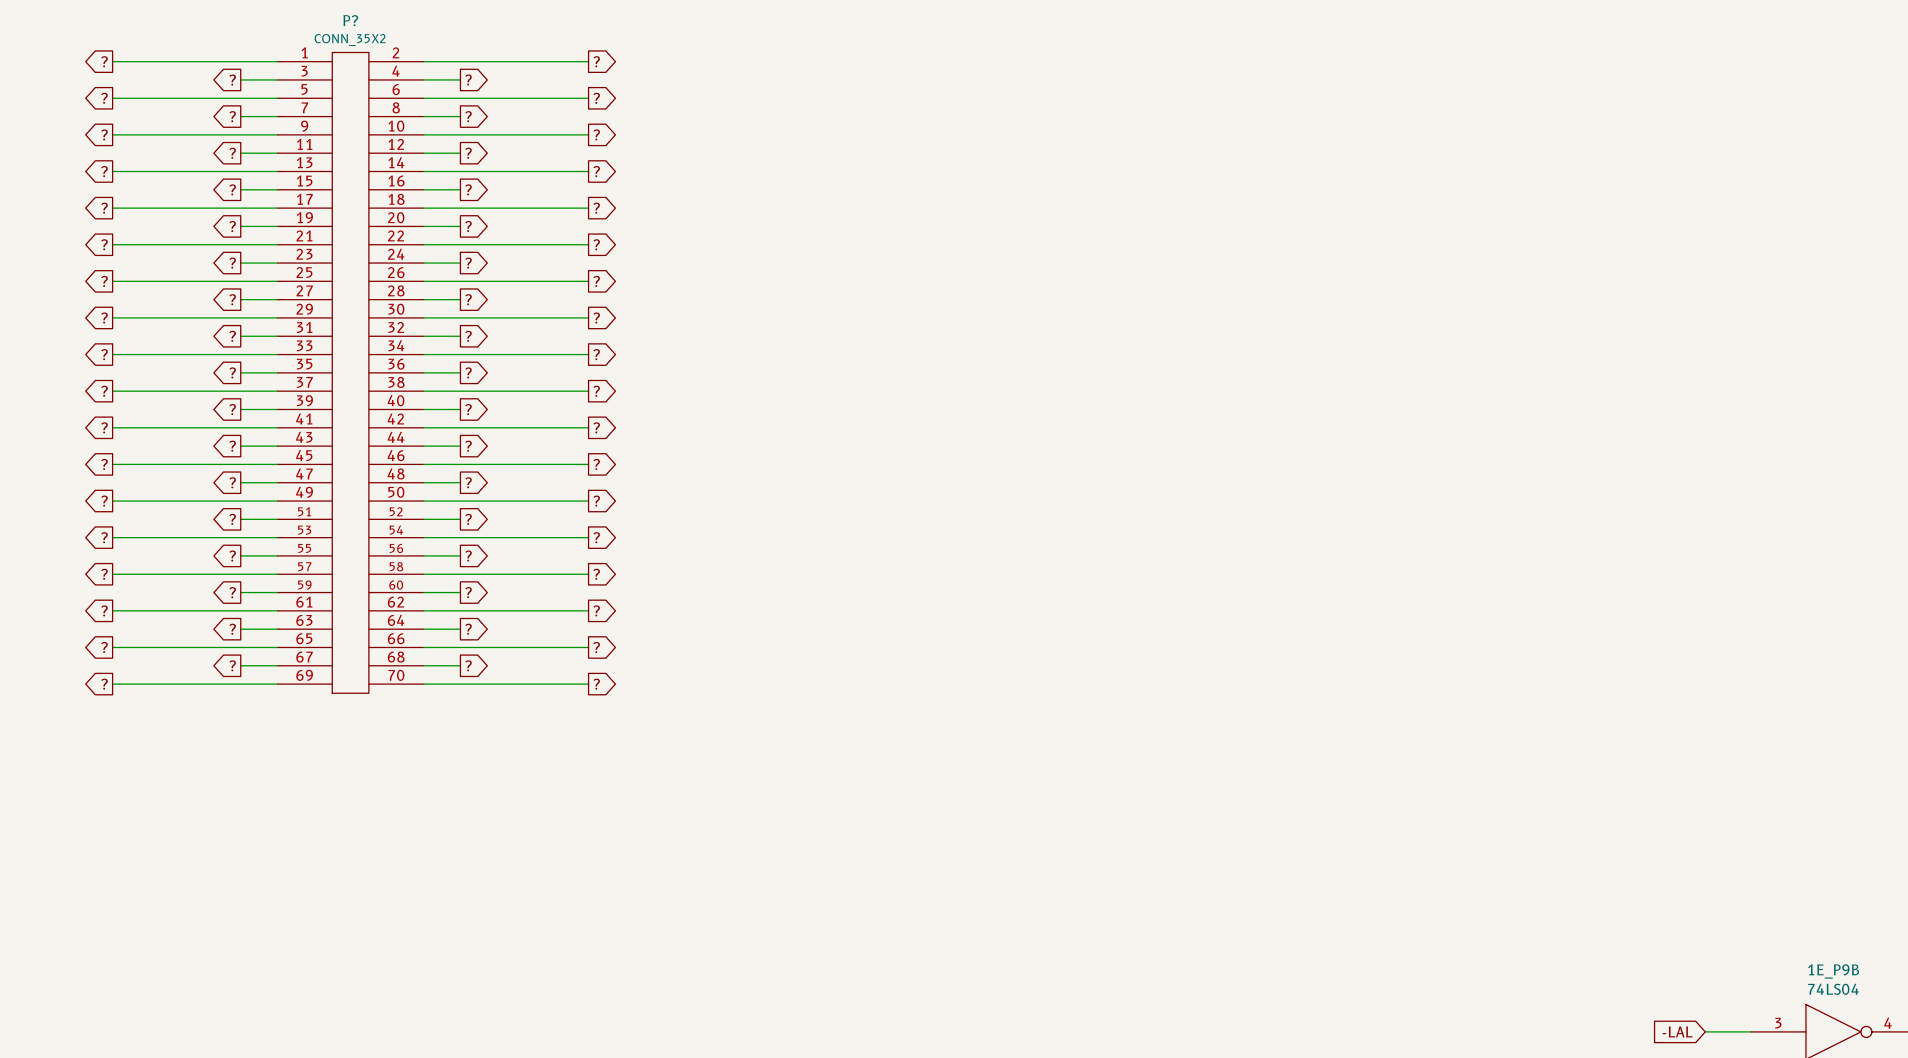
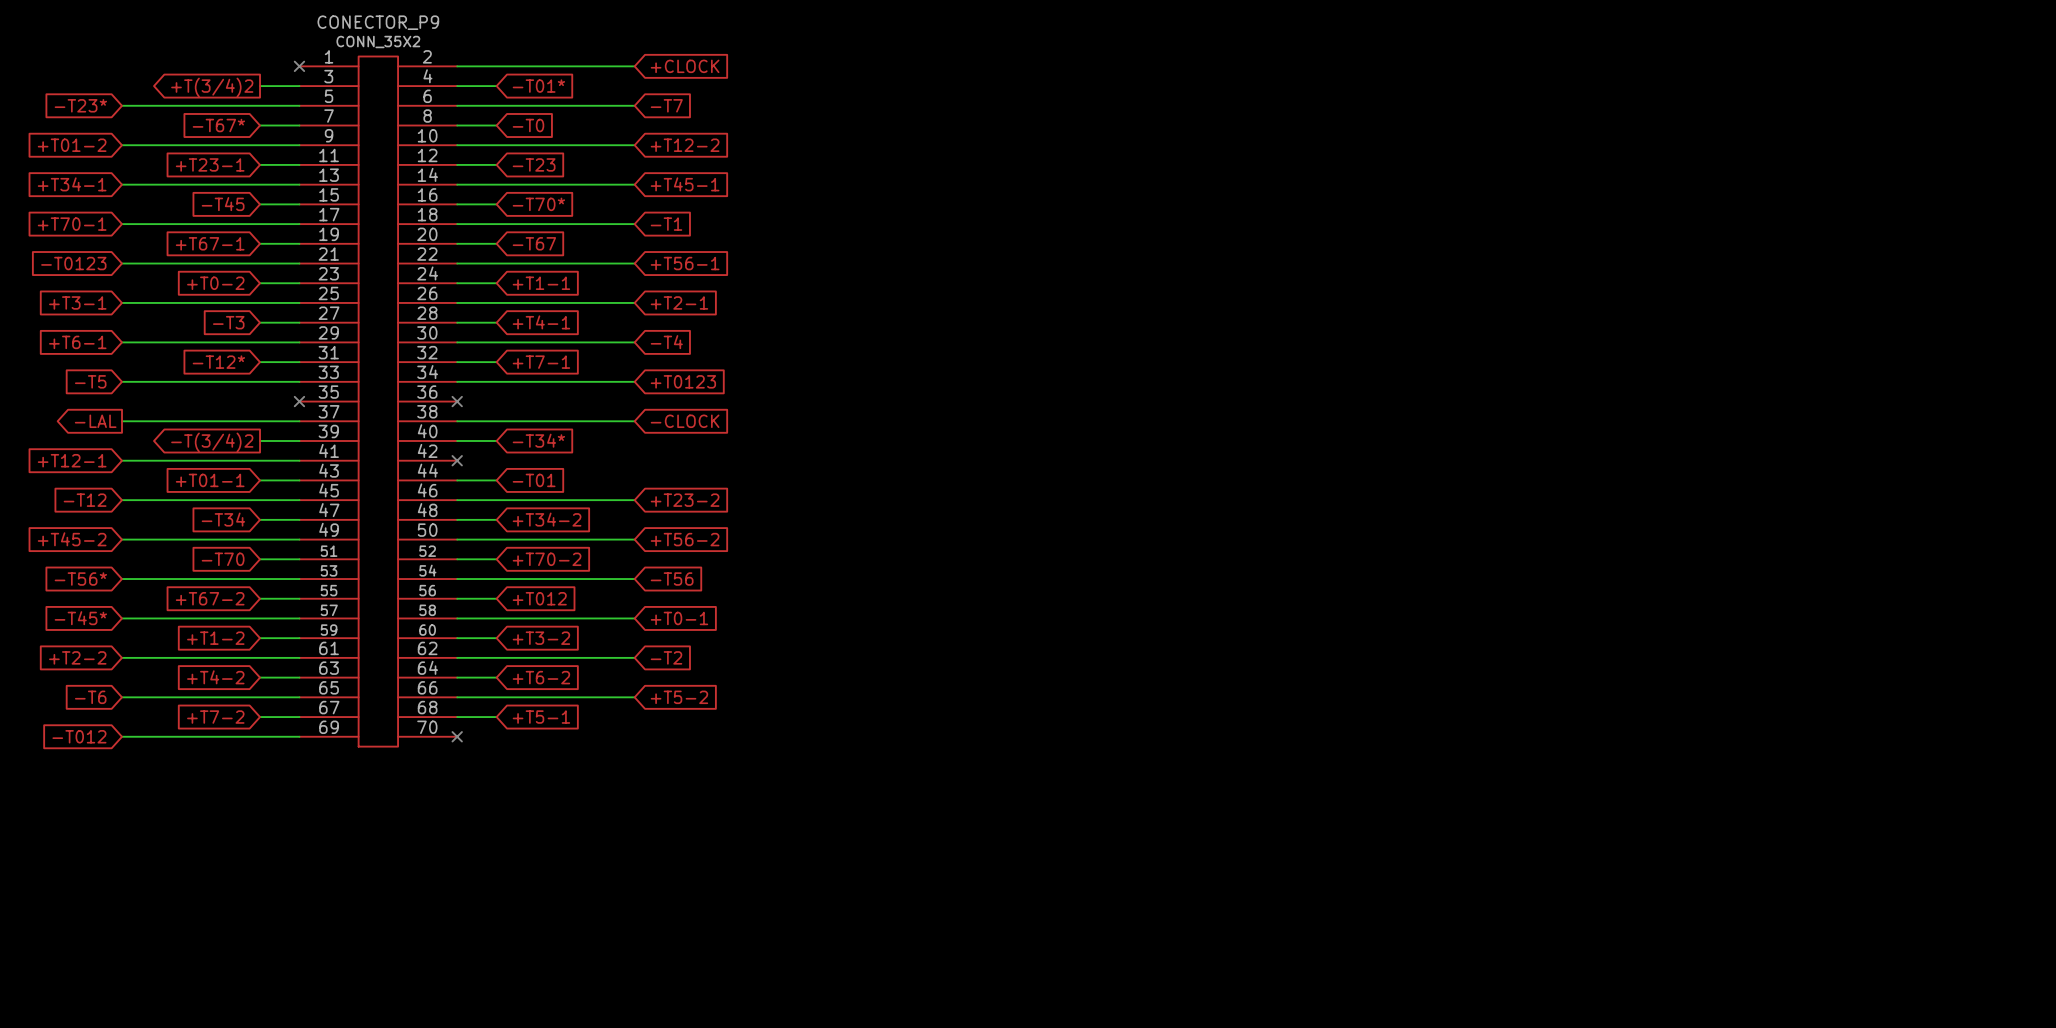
P? name: P? (350, 20) -> CONECTOR_P9 (378, 22)
global label: ? (104, 61) -> none
wire: (112, 61) (277, 61) -> none
no-connect mark: none -> (299, 66)
global label shape: output (596, 61) -> input (685, 66)
global label: ? (596, 61) -> +CLOCK (685, 66)
global label: ? (232, 80) -> +T(3/4)2 (212, 87)
global label shape: output (468, 80) -> input (538, 86)
global label: ? (468, 80) -> -T01* (538, 86)
global label shape: output (104, 98) -> input (80, 105)
global label: ? (104, 98) -> -T23* (80, 105)
global label shape: output (596, 98) -> input (666, 105)
global label: ? (596, 98) -> -T7 (666, 105)
global label shape: output (232, 116) -> input (218, 125)
global label: ? (232, 116) -> -T67* (218, 125)
global label shape: output (468, 116) -> input (528, 125)
global label: ? (468, 116) -> -T0 (528, 125)
global label shape: output (104, 134) -> input (72, 145)
global label: ? (104, 134) -> +T01-2 (72, 145)
global label shape: output (596, 134) -> input (685, 145)
global label: ? (596, 134) -> +T12-2 (685, 145)
global label shape: output (232, 153) -> input (210, 164)
global label: ? (232, 153) -> +T23-1 (210, 164)
global label shape: output (468, 153) -> input (534, 164)
global label: ? (468, 153) -> -T23 (534, 164)
global label shape: output (104, 171) -> input (72, 184)
global label: ? (104, 171) -> +T34-1 (72, 184)
global label shape: output (596, 171) -> input (685, 184)
global label: ? (596, 171) -> +T45-1 (685, 184)
global label shape: output (232, 189) -> input (223, 204)
global label: ? (232, 189) -> -T45 (223, 204)
global label shape: output (468, 189) -> input (538, 204)
global label: ? (468, 189) -> -T70* (538, 204)
global label shape: output (104, 208) -> input (72, 224)
global label: ? (104, 208) -> +T70-1 (72, 224)
global label shape: output (596, 208) -> input (666, 224)
global label: ? (596, 208) -> -T1 (666, 224)
global label shape: output (232, 226) -> input (210, 243)
global label: ? (232, 226) -> +T67-1 (210, 243)
global label shape: output (468, 226) -> input (534, 243)
global label: ? (468, 226) -> -T67 (534, 243)
global label shape: output (104, 244) -> input (73, 263)
global label: ? (104, 244) -> -T0123 (73, 263)
global label shape: output (596, 244) -> input (685, 263)
global label: ? (596, 244) -> +T56-1 (685, 263)
global label shape: output (232, 263) -> input (215, 283)
global label: ? (232, 263) -> +T0-2 (215, 283)
global label shape: output (468, 263) -> input (541, 283)
global label: ? (468, 263) -> +T1-1 (541, 283)
global label shape: output (104, 281) -> input (77, 302)
global label: ? (104, 281) -> +T3-1 (77, 302)
global label shape: output (596, 281) -> input (679, 302)
global label: ? (596, 281) -> +T2-1 (679, 302)
global label shape: output (232, 299) -> input (228, 322)
global label: ? (232, 299) -> -T3 (228, 322)
global label shape: output (468, 299) -> input (541, 322)
global label: ? (468, 299) -> +T4-1 (541, 322)
global label shape: output (104, 318) -> input (77, 342)
global label: ? (104, 318) -> +T6-1 (77, 342)
global label shape: output (596, 318) -> input (666, 342)
global label: ? (596, 318) -> -T4 (666, 342)
global label shape: output (232, 336) -> input (218, 362)
global label: ? (232, 336) -> -T12* (218, 362)
global label shape: output (468, 336) -> input (541, 362)
global label: ? (468, 336) -> +T7-1 (541, 362)
global label shape: output (104, 354) -> input (90, 381)
global label: ? (104, 354) -> -T5 (90, 381)
global label shape: output (596, 354) -> input (683, 381)
global label: ? (596, 354) -> +T0123 (683, 381)
global label: ? (232, 372) -> none
wire: (240, 372) (277, 372) -> none
no-connect mark: none -> (299, 401)
wire: (423, 372) (460, 372) -> none
no-connect mark: none -> (457, 401)
global label: ? (468, 372) -> none
global label: ? (104, 391) -> -LAL (95, 421)
global label shape: output (596, 391) -> input (685, 421)
global label: ? (596, 391) -> -CLOCK (685, 421)
global label: ? (232, 409) -> -T(3/4)2 (212, 442)
global label shape: output (468, 409) -> input (538, 440)
global label: ? (468, 409) -> -T34* (538, 440)
global label shape: output (104, 427) -> input (72, 460)
global label: ? (104, 427) -> +T12-1 (72, 460)
wire: (423, 427) (588, 427) -> none
no-connect mark: none -> (457, 460)
global label: ? (596, 427) -> none
global label shape: output (232, 446) -> input (210, 480)
global label: ? (232, 446) -> +T01-1 (210, 480)
global label shape: output (468, 446) -> input (534, 480)
global label: ? (468, 446) -> -T01 (534, 480)
global label shape: output (104, 464) -> input (85, 500)
global label: ? (104, 464) -> -T12 (85, 500)
global label shape: output (596, 464) -> input (685, 500)
global label: ? (596, 464) -> +T23-2 (685, 500)
global label shape: output (232, 482) -> input (223, 519)
global label: ? (232, 482) -> -T34 (223, 519)
global label shape: output (468, 482) -> input (547, 519)
global label: ? (468, 482) -> +T34-2 (547, 519)
global label shape: output (104, 501) -> input (72, 539)
global label: ? (104, 501) -> +T45-2 (72, 539)
global label shape: output (596, 501) -> input (685, 539)
global label: ? (596, 501) -> +T56-2 (685, 539)
global label shape: output (232, 519) -> input (223, 559)
global label: ? (232, 519) -> -T70 (223, 559)
global label shape: output (468, 519) -> input (547, 559)
global label: ? (468, 519) -> +T70-2 (547, 559)
global label shape: output (104, 537) -> input (80, 579)
global label: ? (104, 537) -> -T56* (80, 579)
global label shape: output (596, 537) -> input (672, 579)
global label: ? (596, 537) -> -T56 (672, 579)
global label shape: output (232, 556) -> input (210, 598)
global label: ? (232, 556) -> +T67-2 (210, 598)
global label shape: output (468, 556) -> input (539, 598)
global label: ? (468, 556) -> +T012 (539, 598)
global label shape: output (104, 574) -> input (80, 618)
global label: ? (104, 574) -> -T45* (80, 618)
global label shape: output (596, 574) -> input (679, 618)
global label: ? (596, 574) -> +T0-1 (679, 618)
global label shape: output (232, 592) -> input (215, 638)
global label: ? (232, 592) -> +T1-2 (215, 638)
global label shape: output (468, 592) -> input (541, 638)
global label: ? (468, 592) -> +T3-2 (541, 638)
global label shape: output (104, 610) -> input (77, 657)
global label: ? (104, 610) -> +T2-2 (77, 657)
global label shape: output (596, 610) -> input (666, 657)
global label: ? (596, 610) -> -T2 (666, 657)
global label shape: output (232, 629) -> input (215, 677)
global label: ? (232, 629) -> +T4-2 (215, 677)
global label shape: output (468, 629) -> input (541, 677)
global label: ? (468, 629) -> +T6-2 (541, 677)
global label shape: output (104, 647) -> input (90, 697)
global label: ? (104, 647) -> -T6 (90, 697)
global label shape: output (596, 647) -> input (679, 697)
global label: ? (596, 647) -> +T5-2 (679, 697)
global label shape: output (232, 665) -> input (215, 717)
global label: ? (232, 665) -> +T7-2 (215, 717)
global label shape: output (468, 665) -> input (541, 717)
global label: ? (468, 665) -> +T5-1 (541, 717)
global label shape: output (104, 684) -> input (79, 736)
global label: ? (104, 684) -> -T012 (79, 736)
wire: (423, 684) (588, 684) -> none
no-connect mark: none -> (457, 736)
global label: ? (596, 684) -> none

